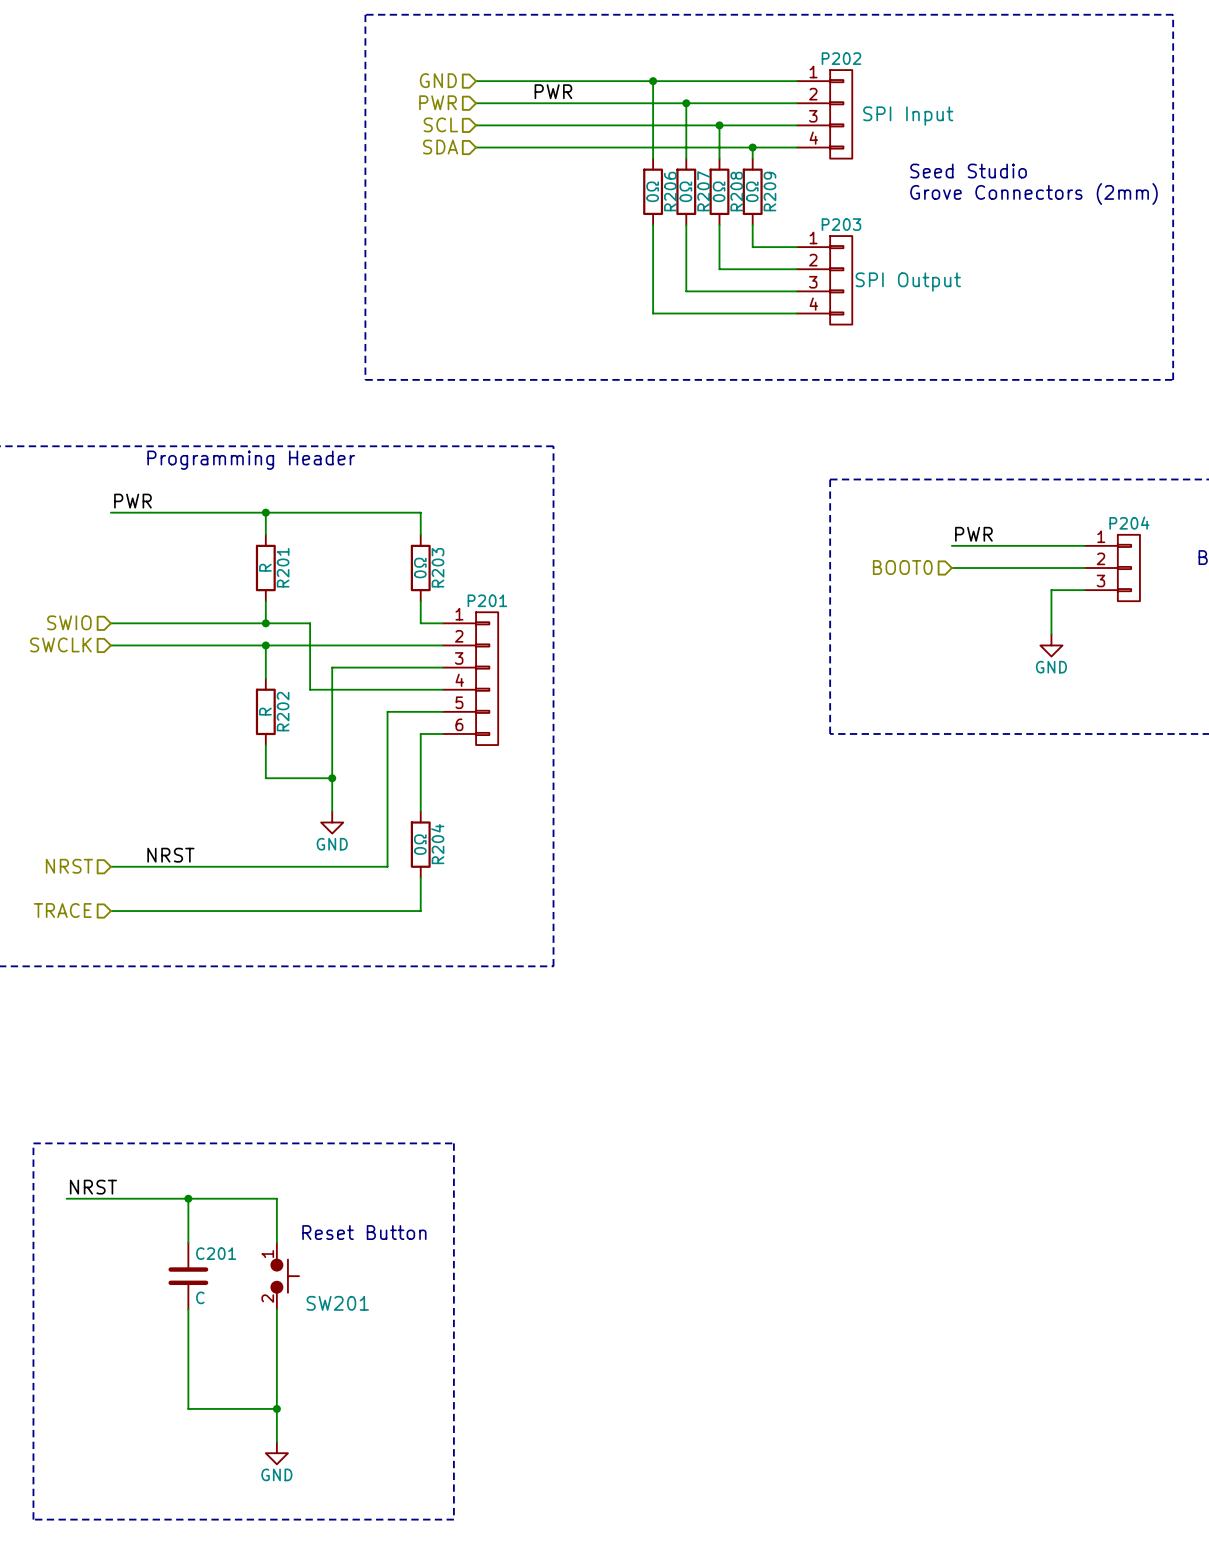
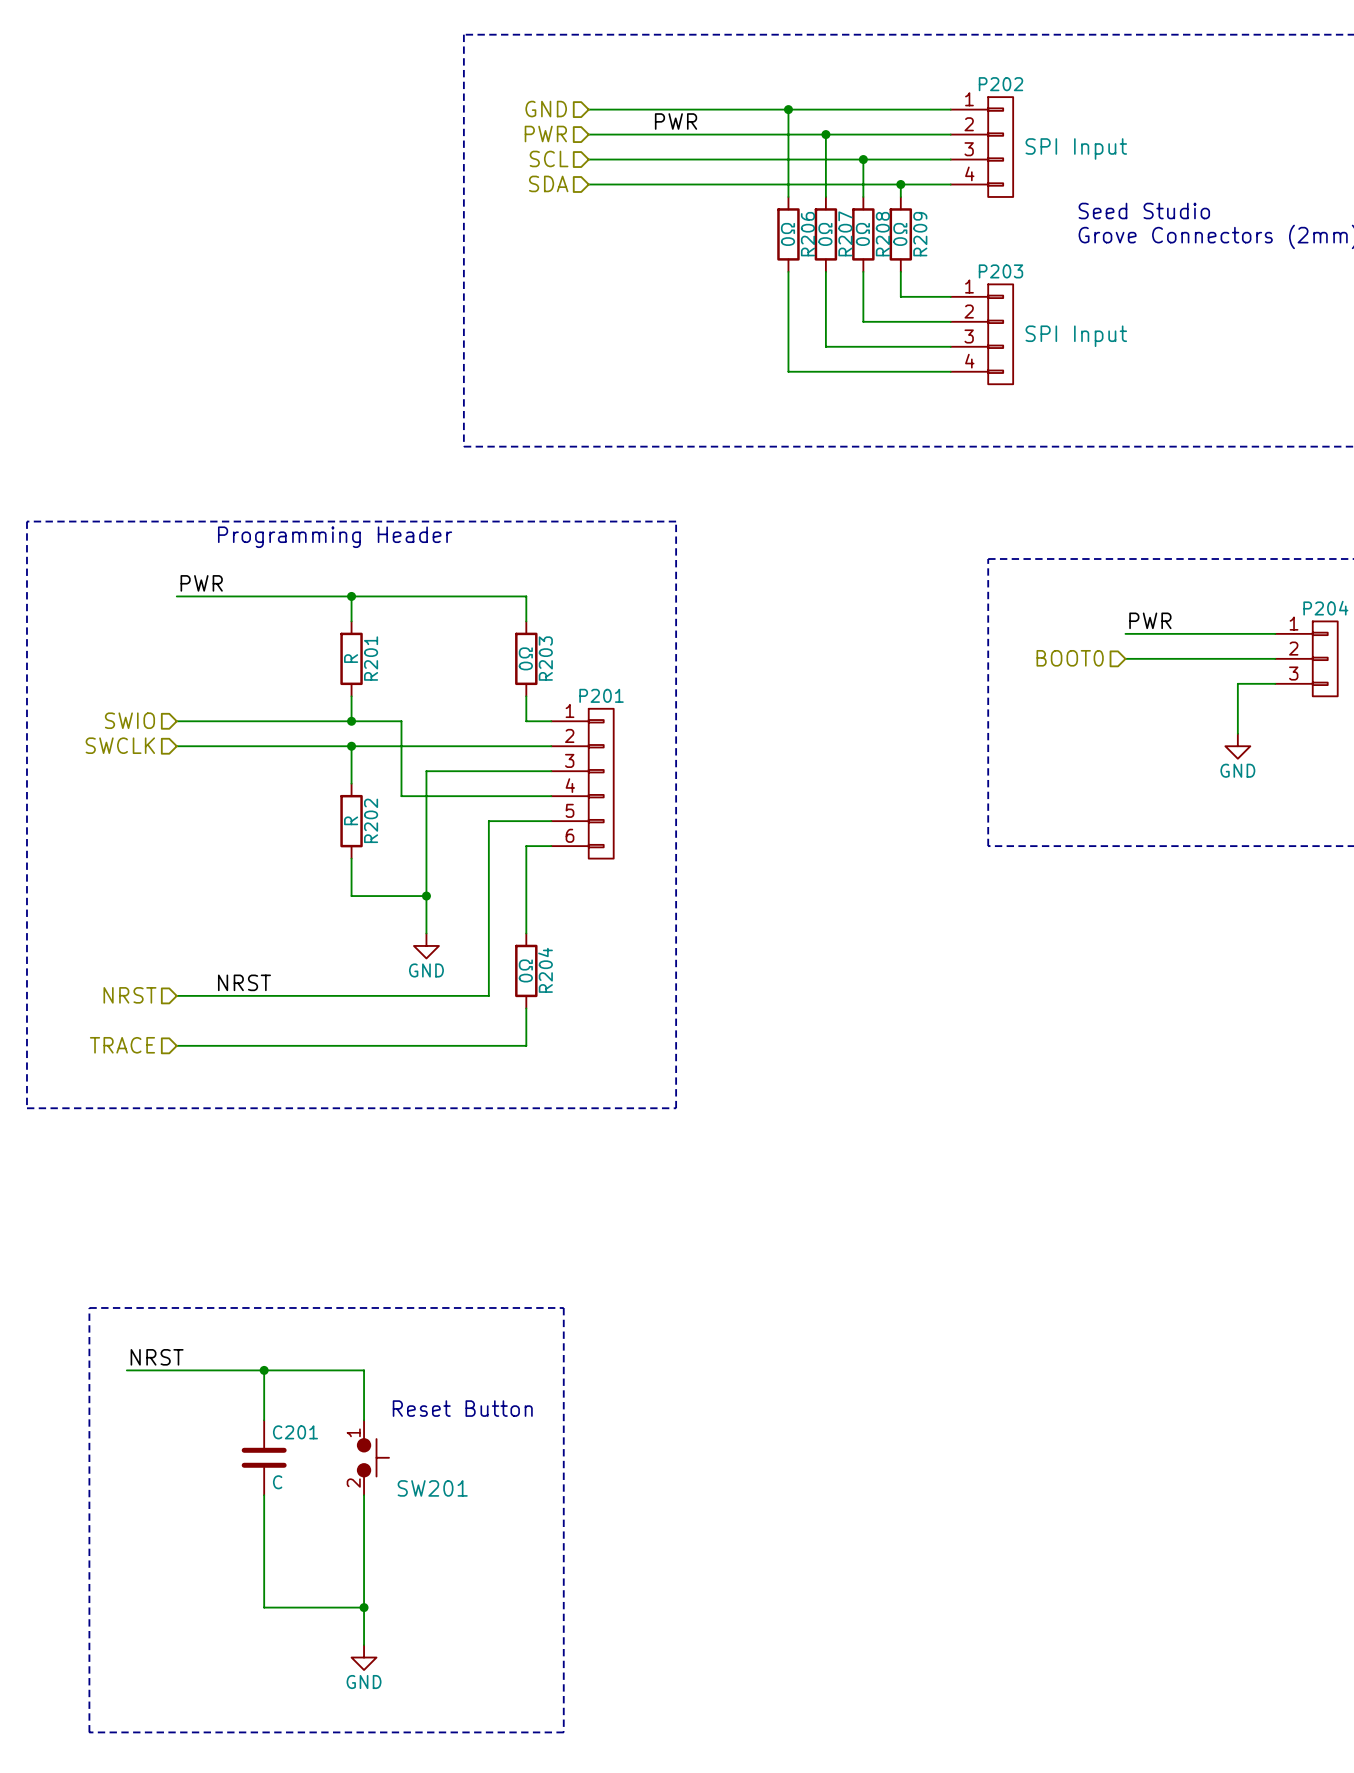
P203 text: SPI Output (908, 282) -> SPI Input (1076, 336)

